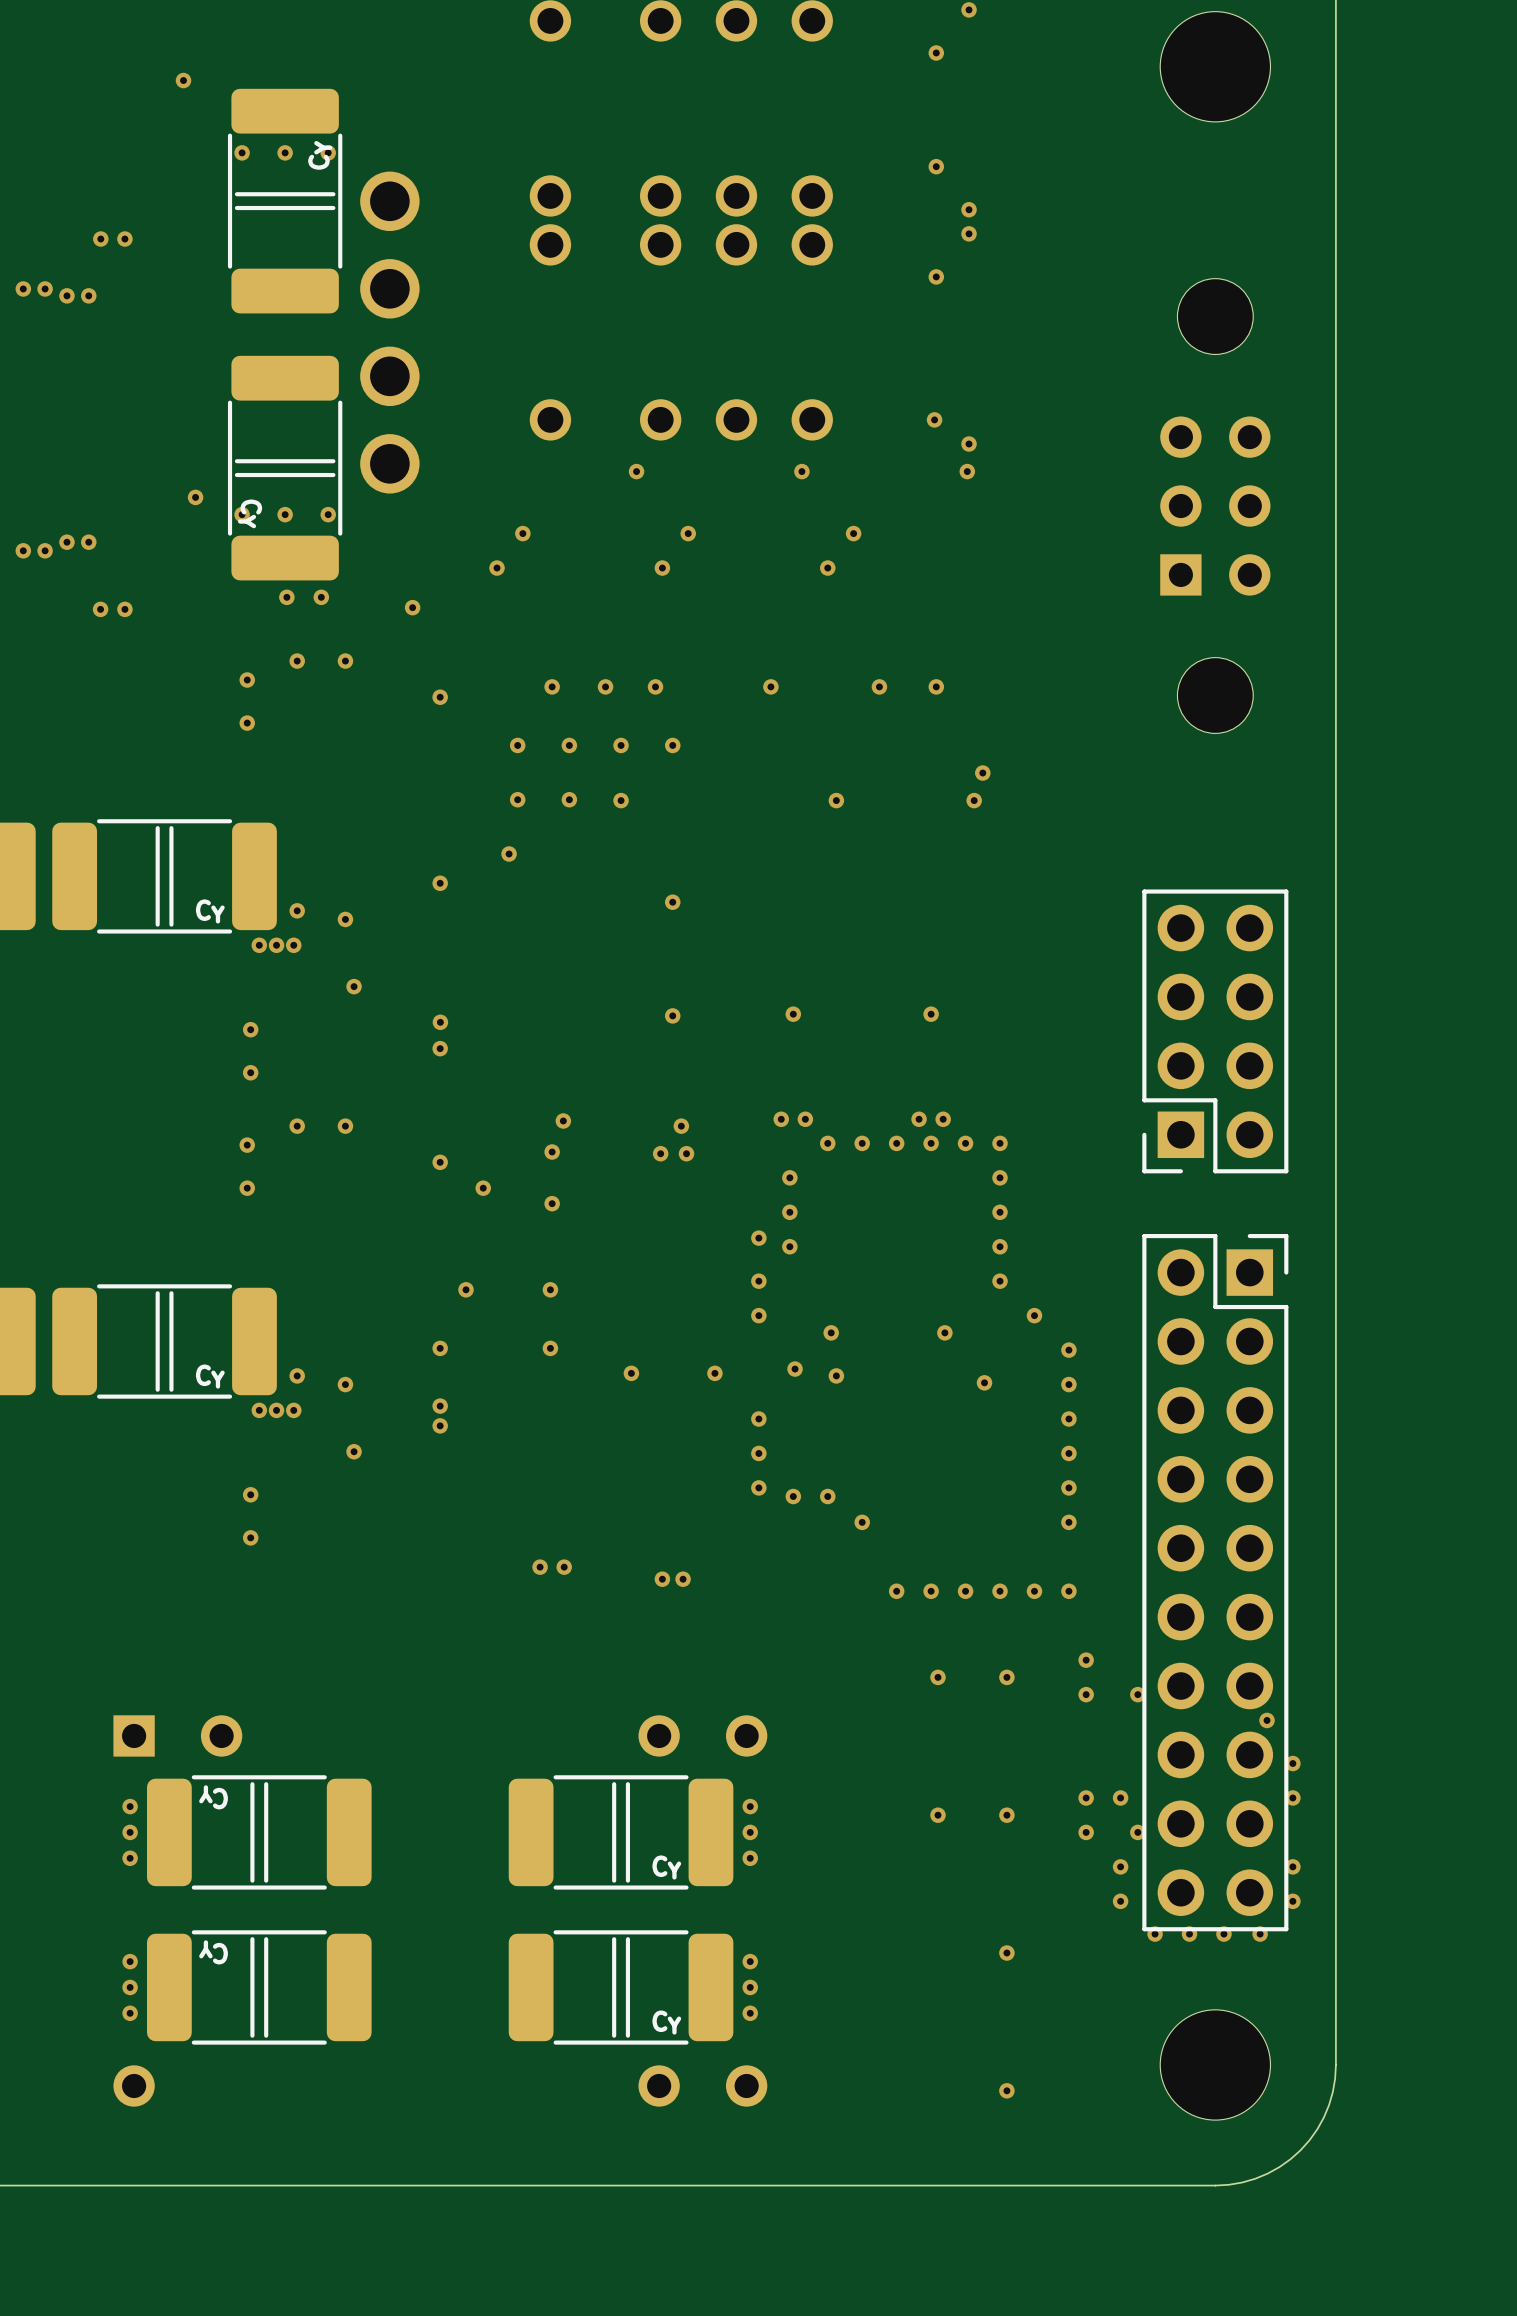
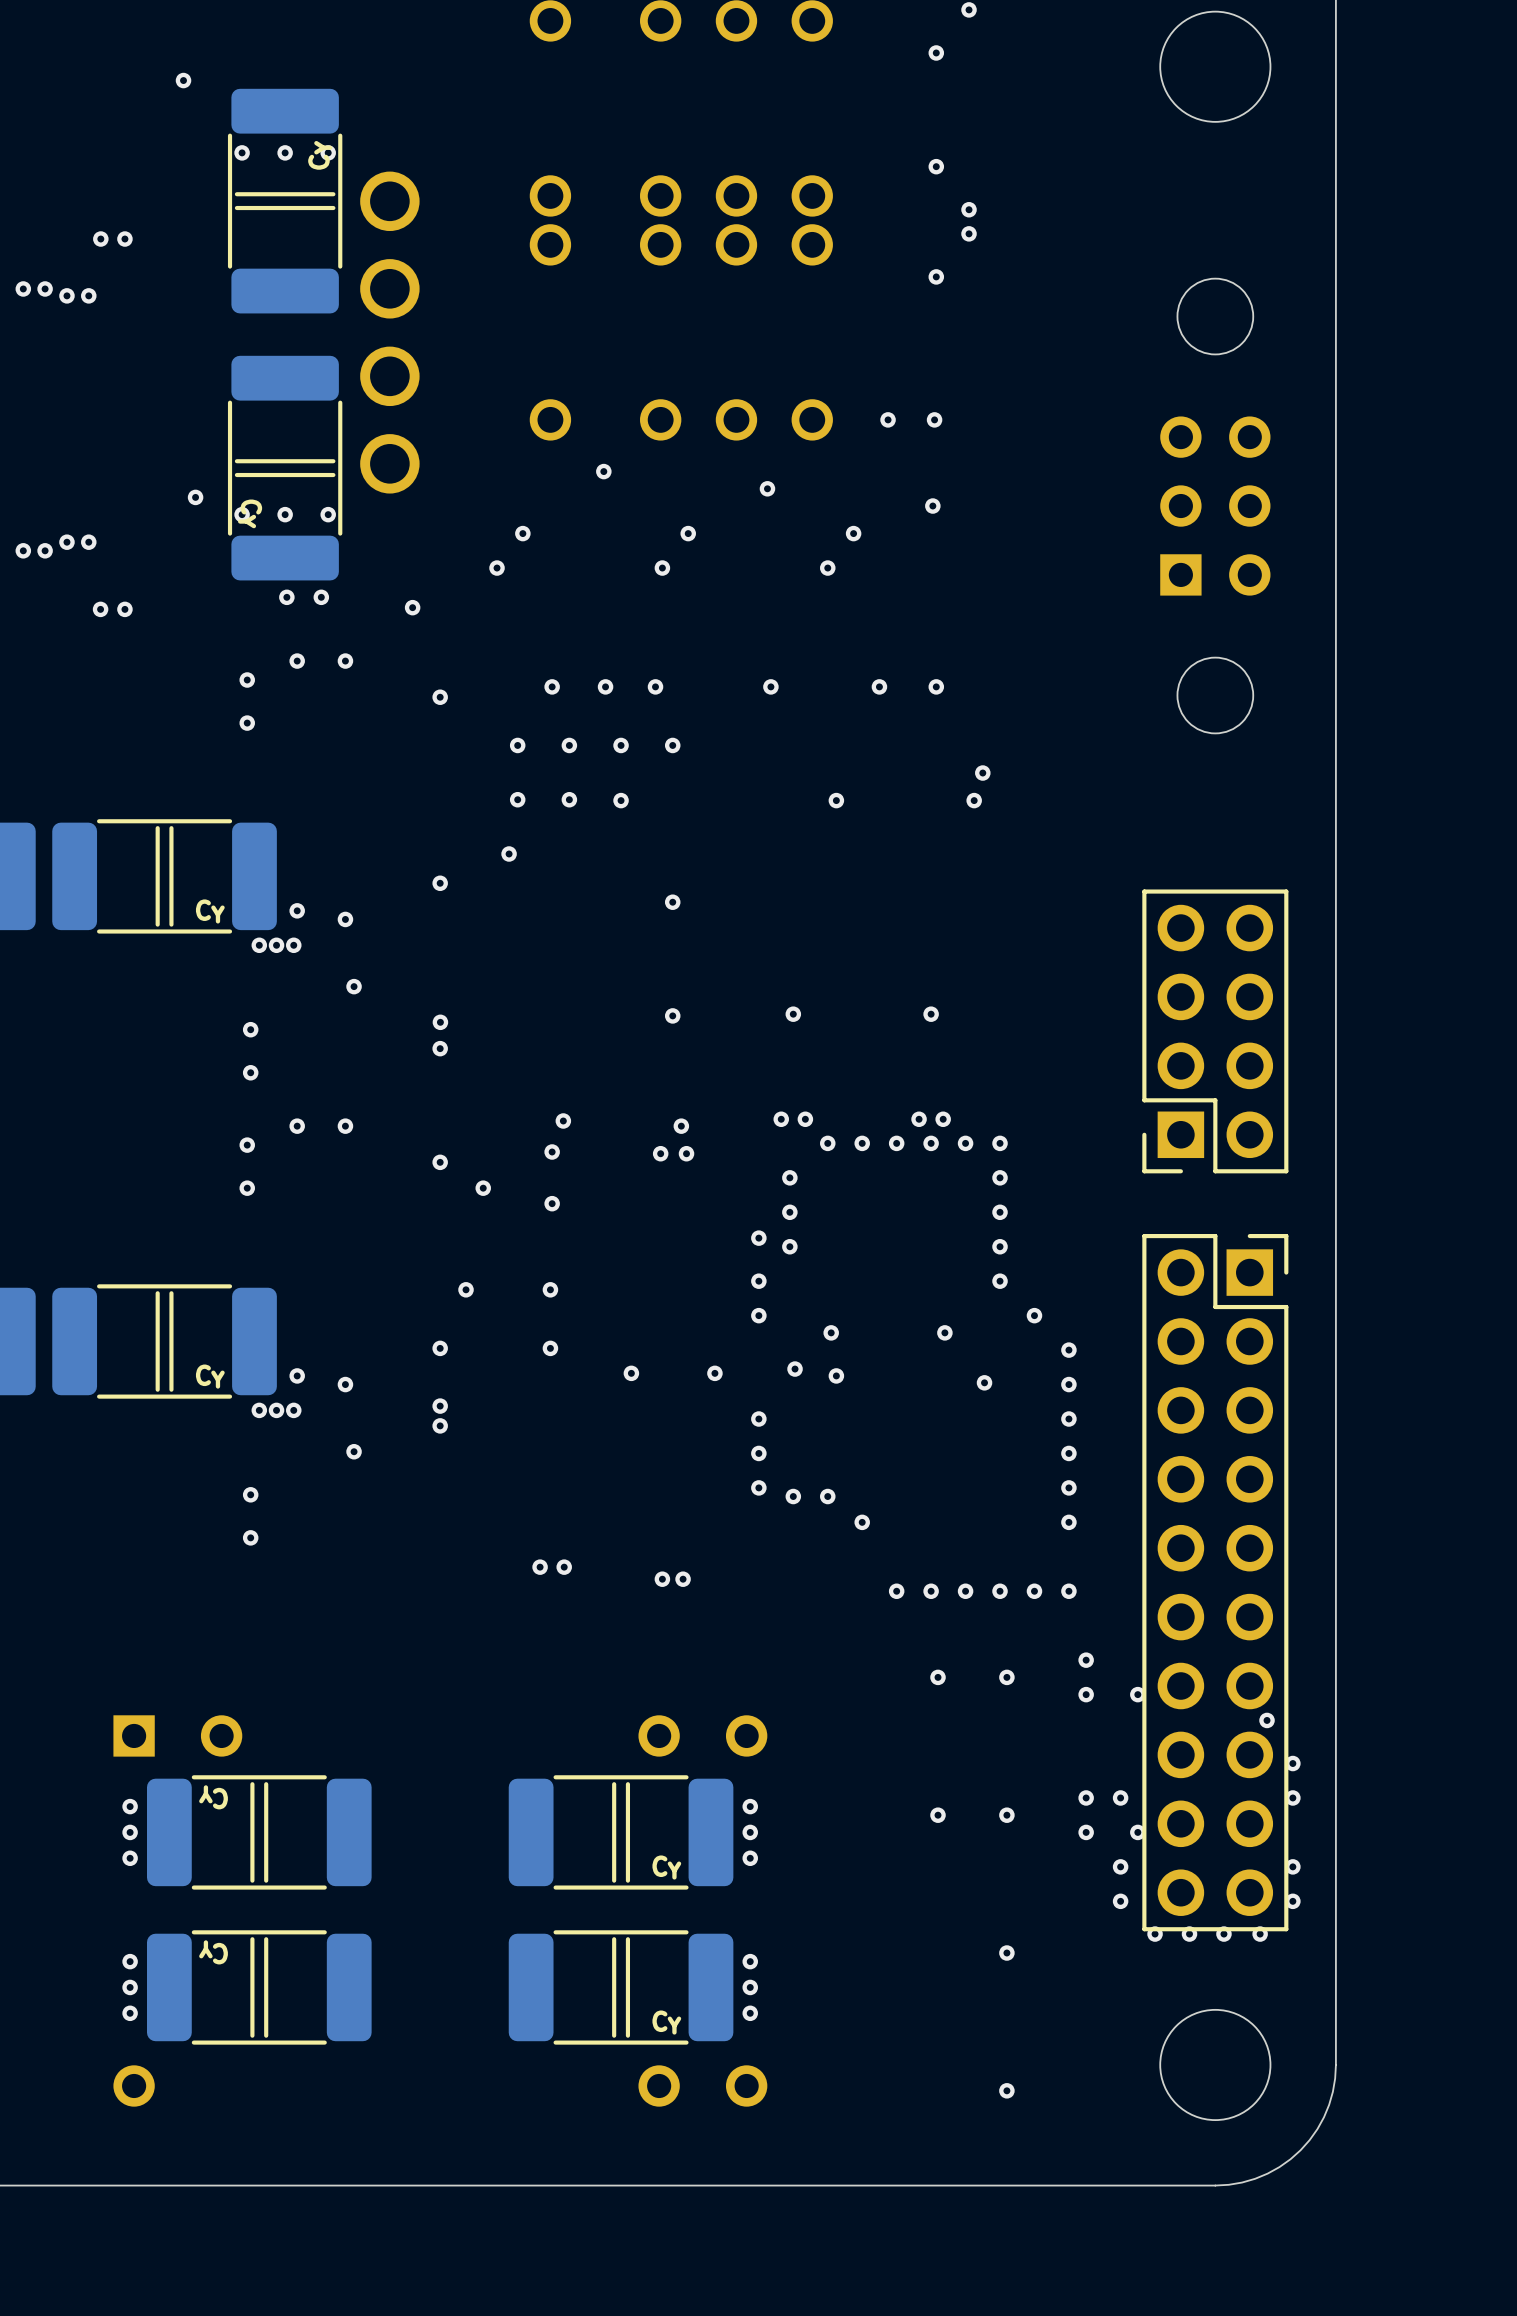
via: none -> (888, 419)
via: (969, 444) -> none
via position: (636, 471) -> (603, 471)
via position: (801, 471) -> (767, 488)
via: (967, 471) -> none
via: none -> (932, 506)

